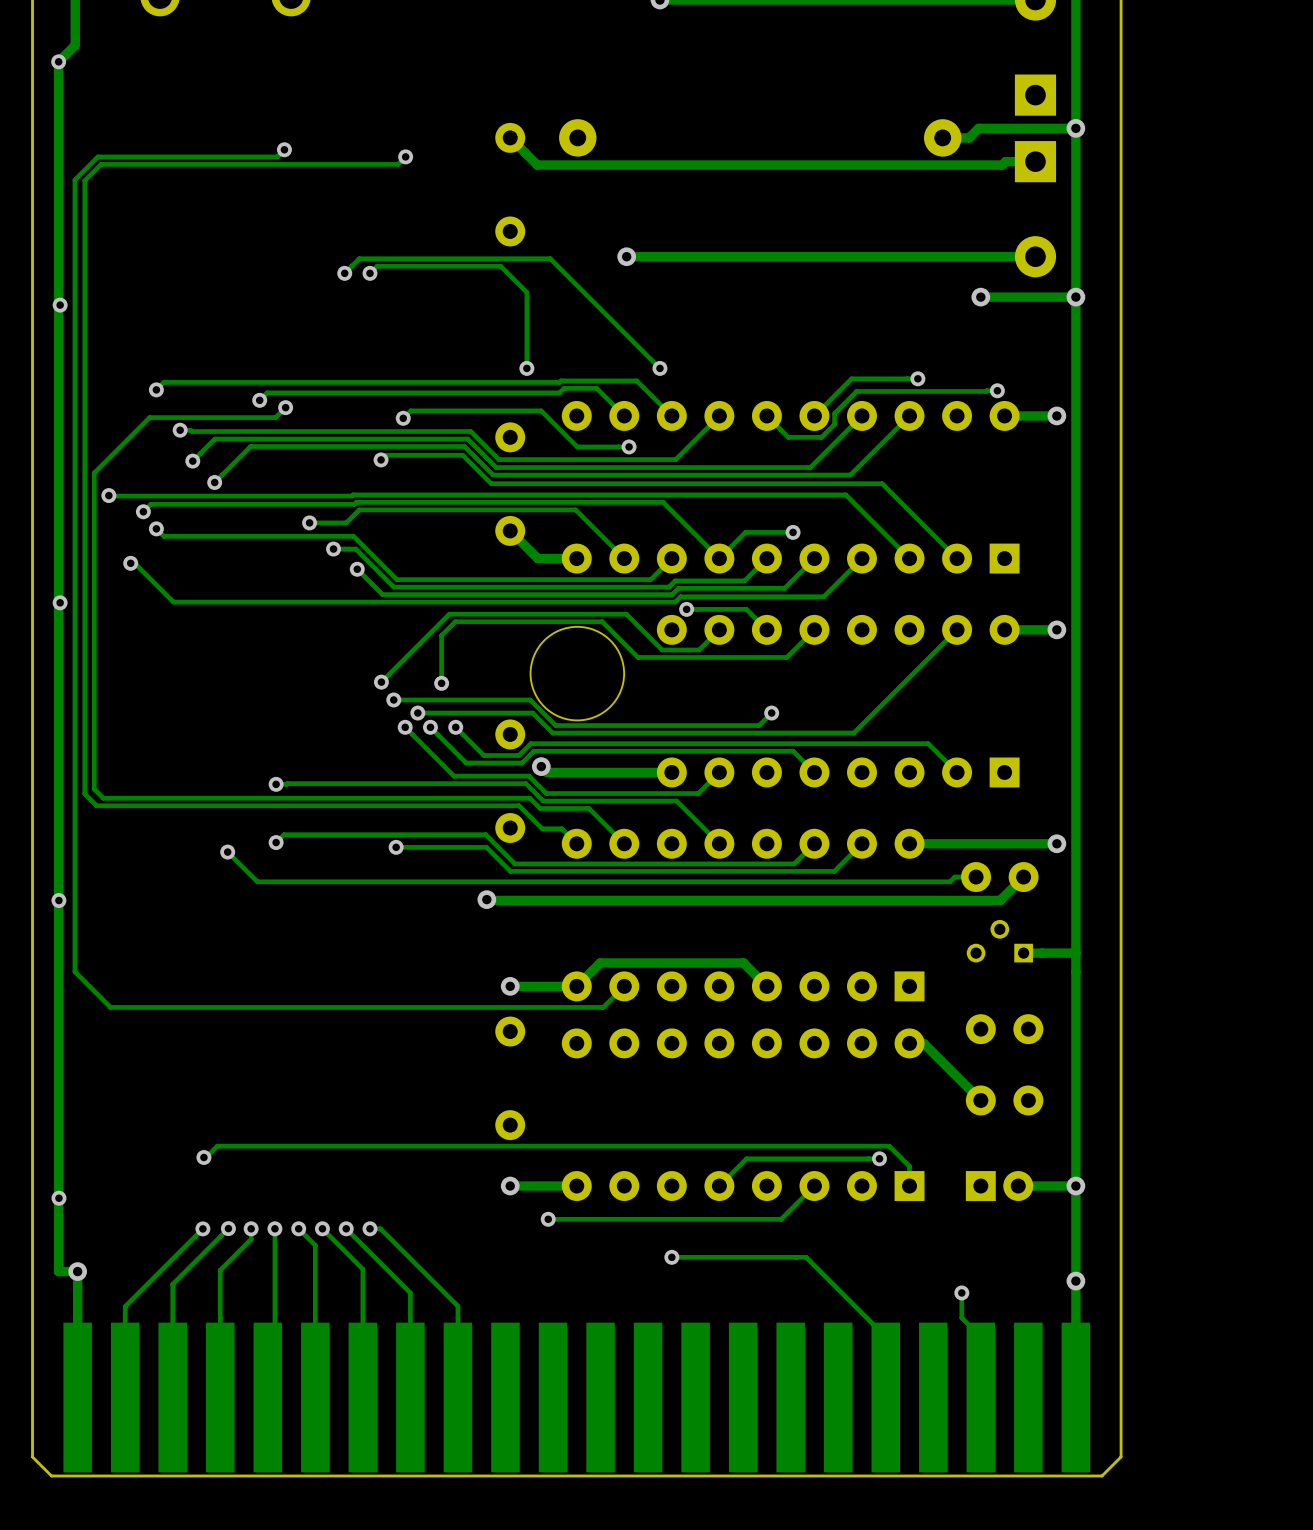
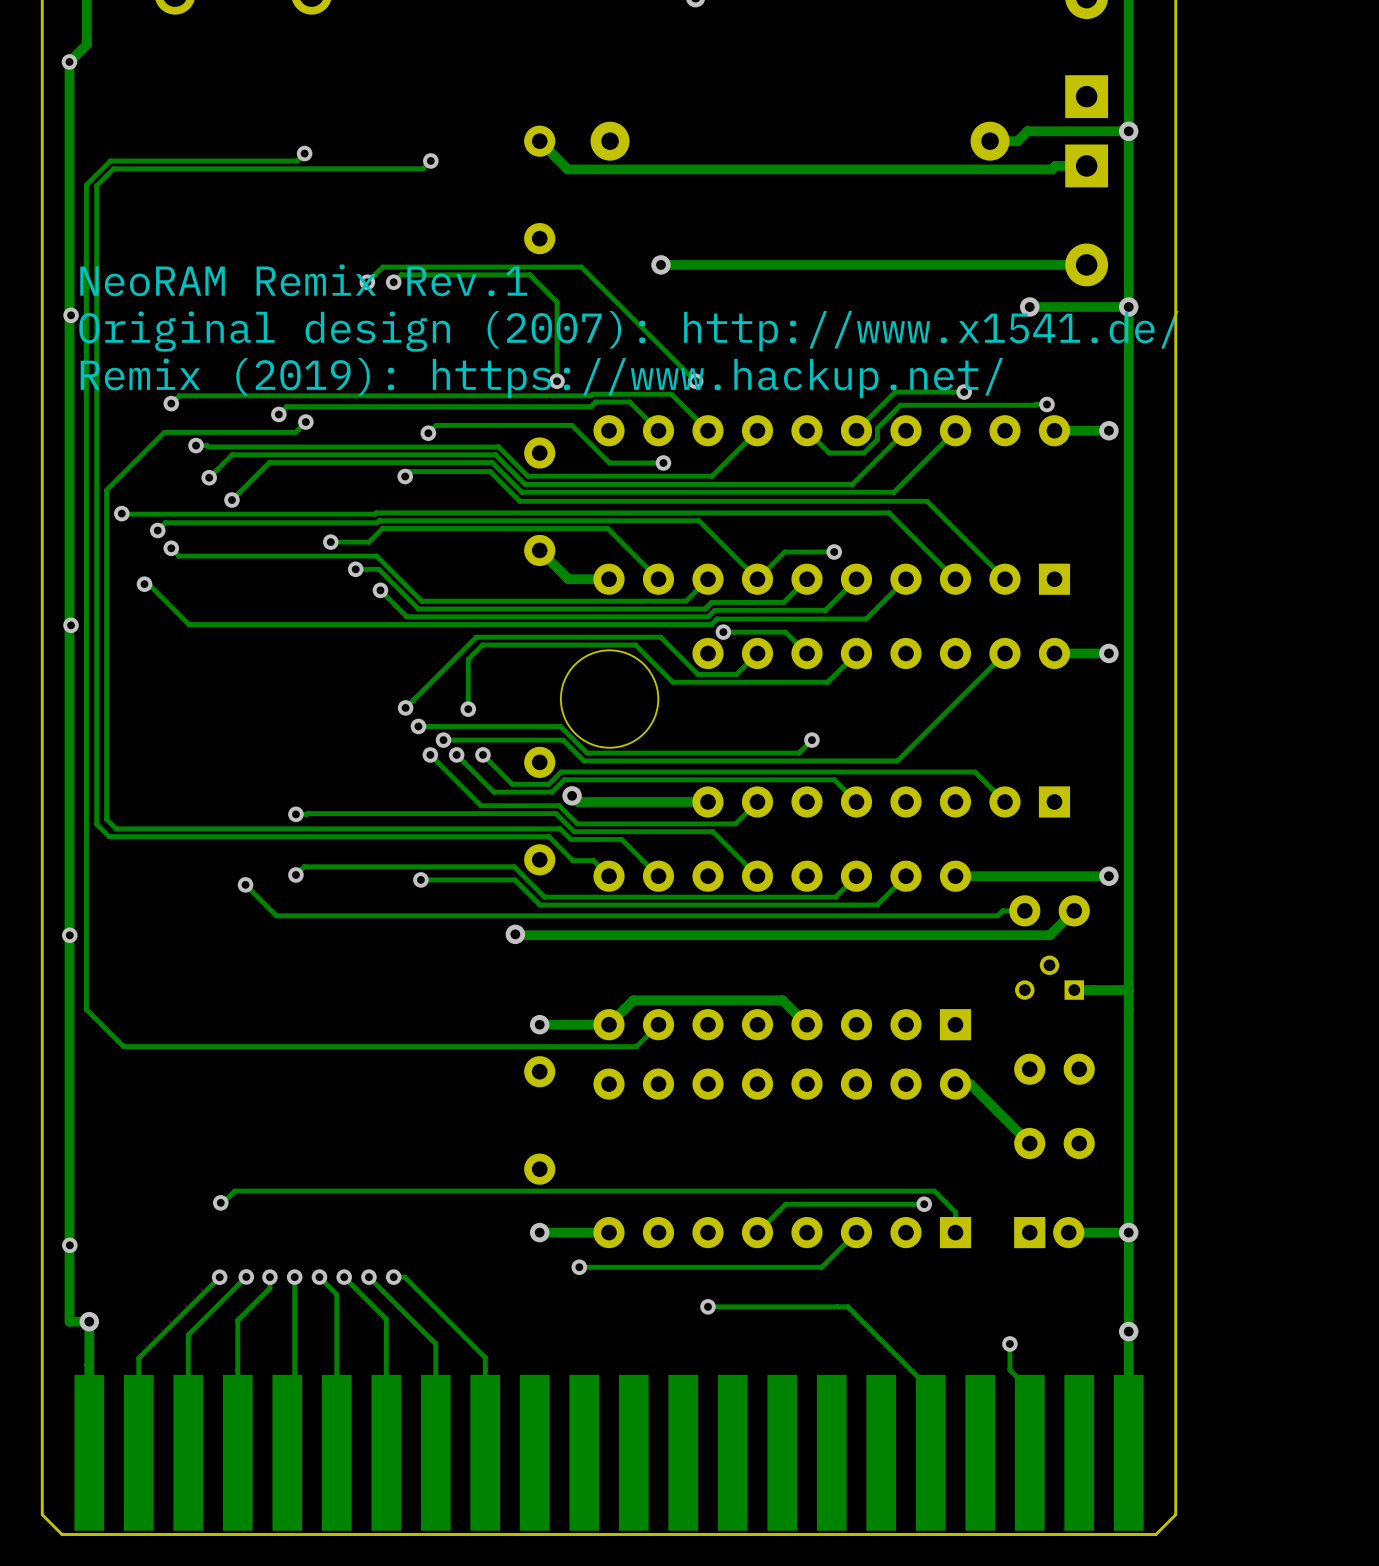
text: none -> NeoRAM Remix Rev.1 (303, 280)
text: none -> Original design (2007): http://www.x1541.de/ (629, 331)
text: none -> Remix (2019): https://www.hackup.net/ (541, 378)

